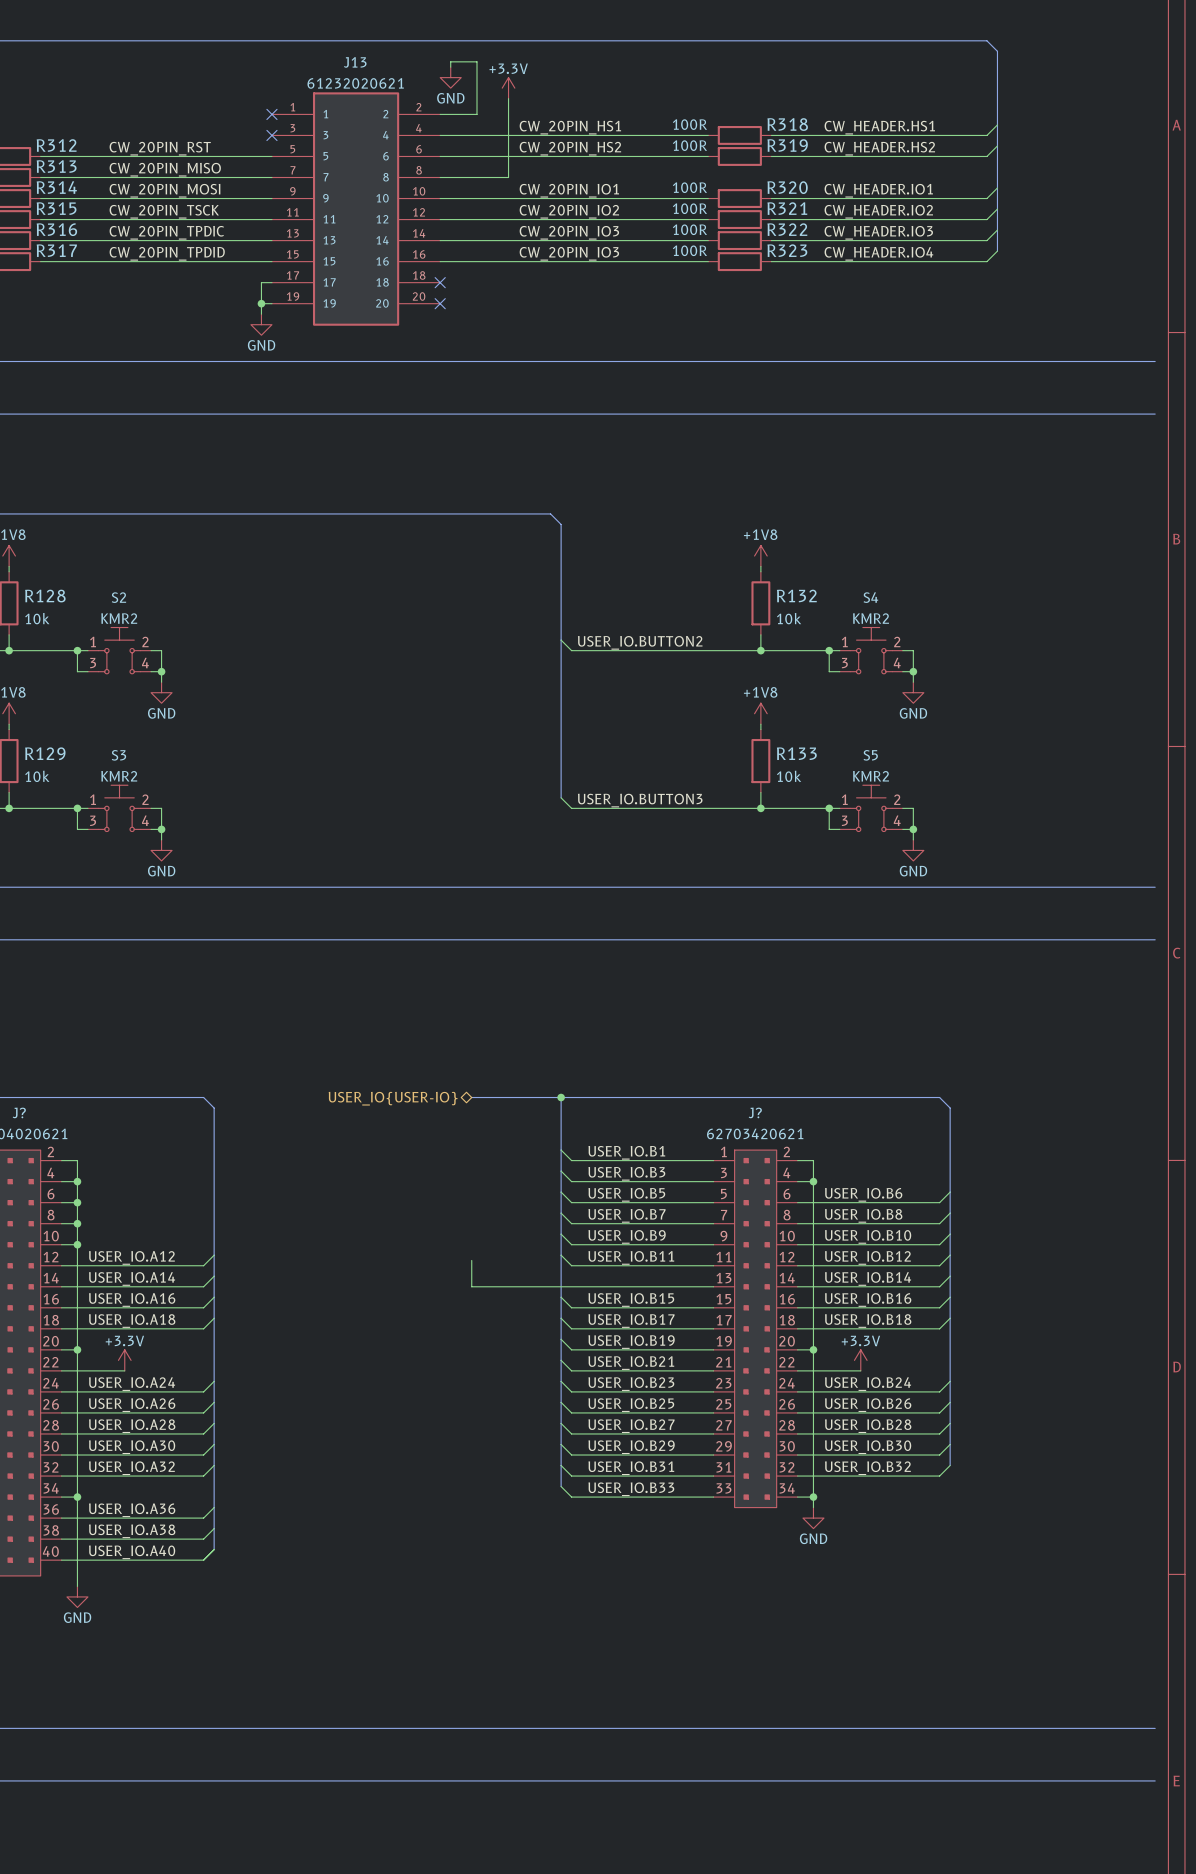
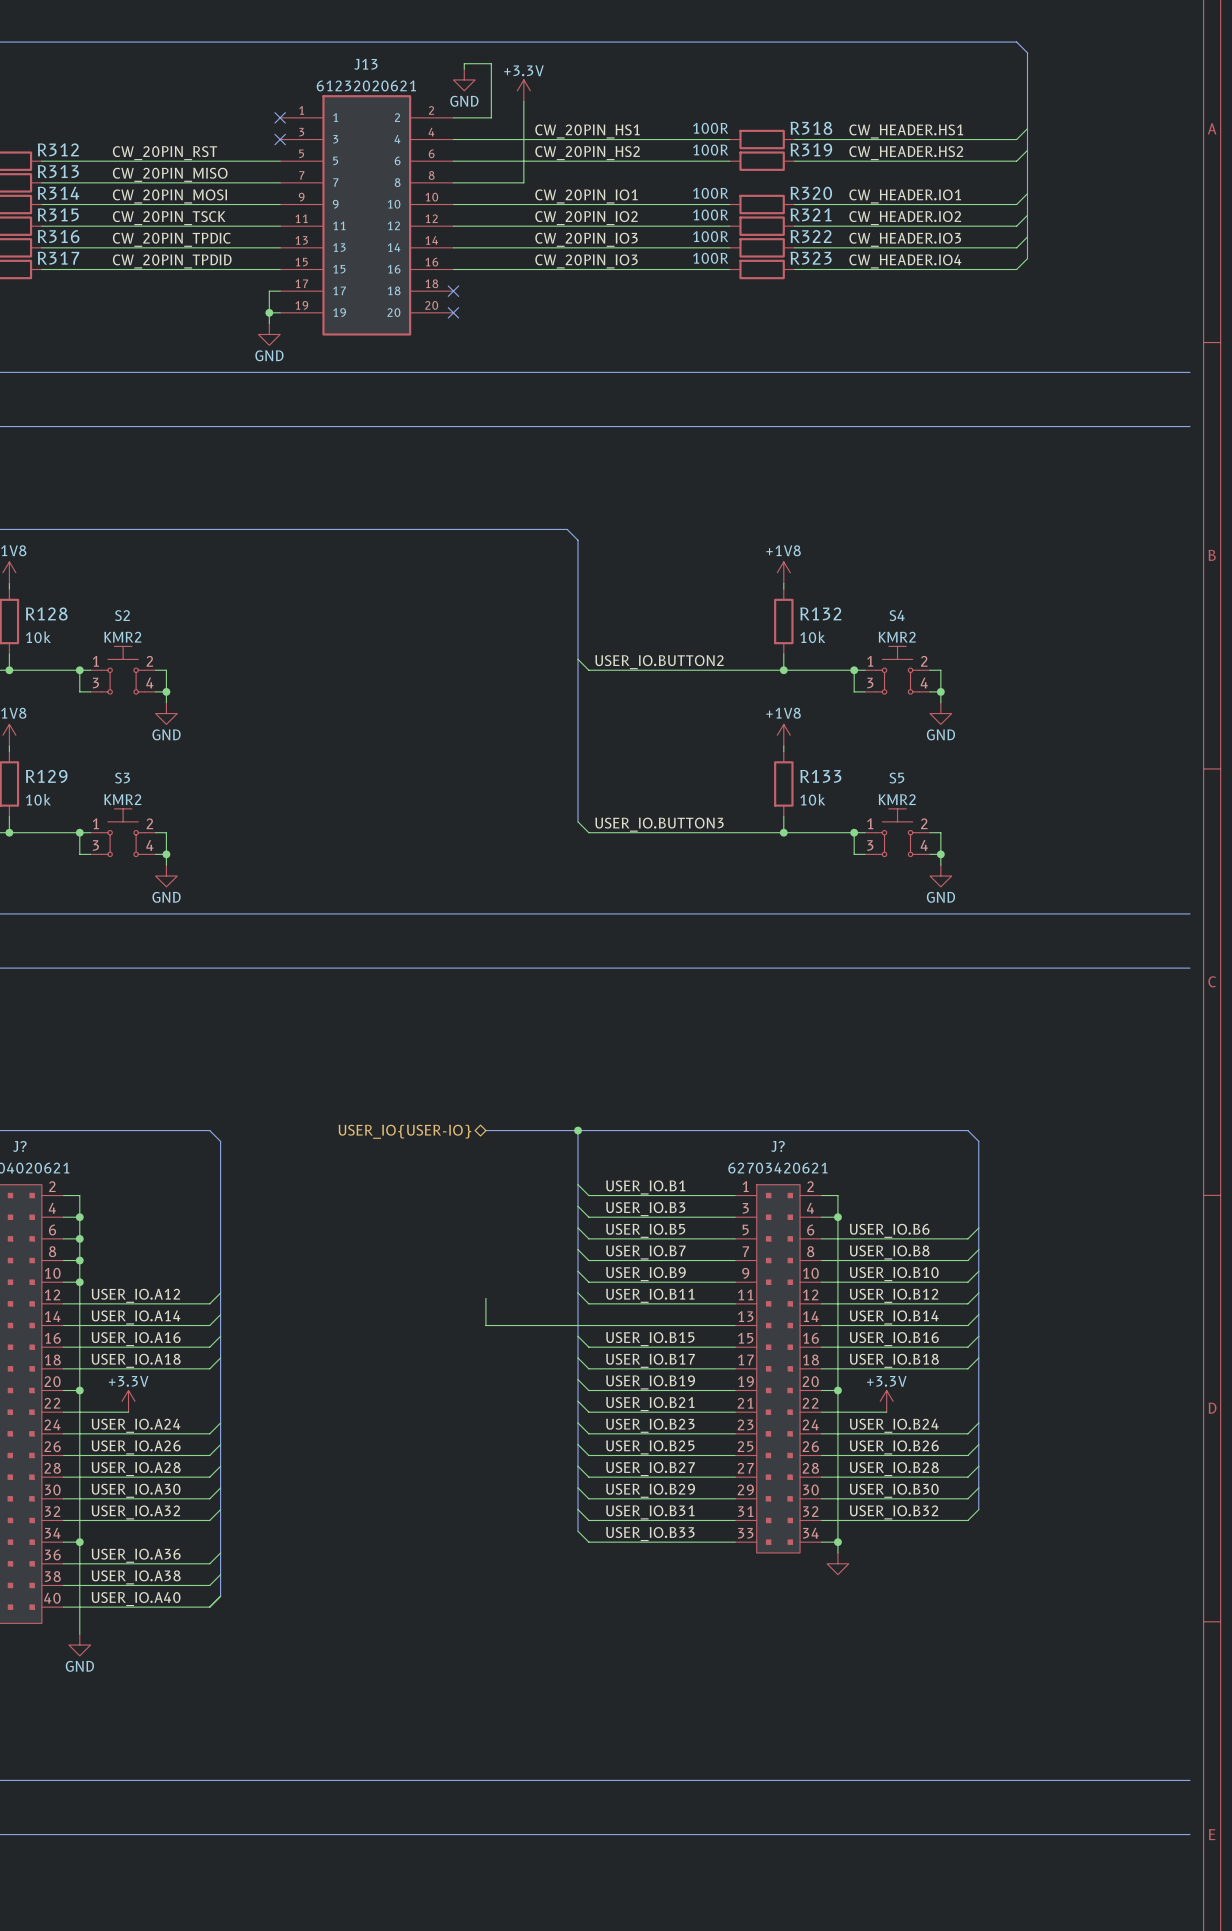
power symbol text: GND (813, 1538) -> none

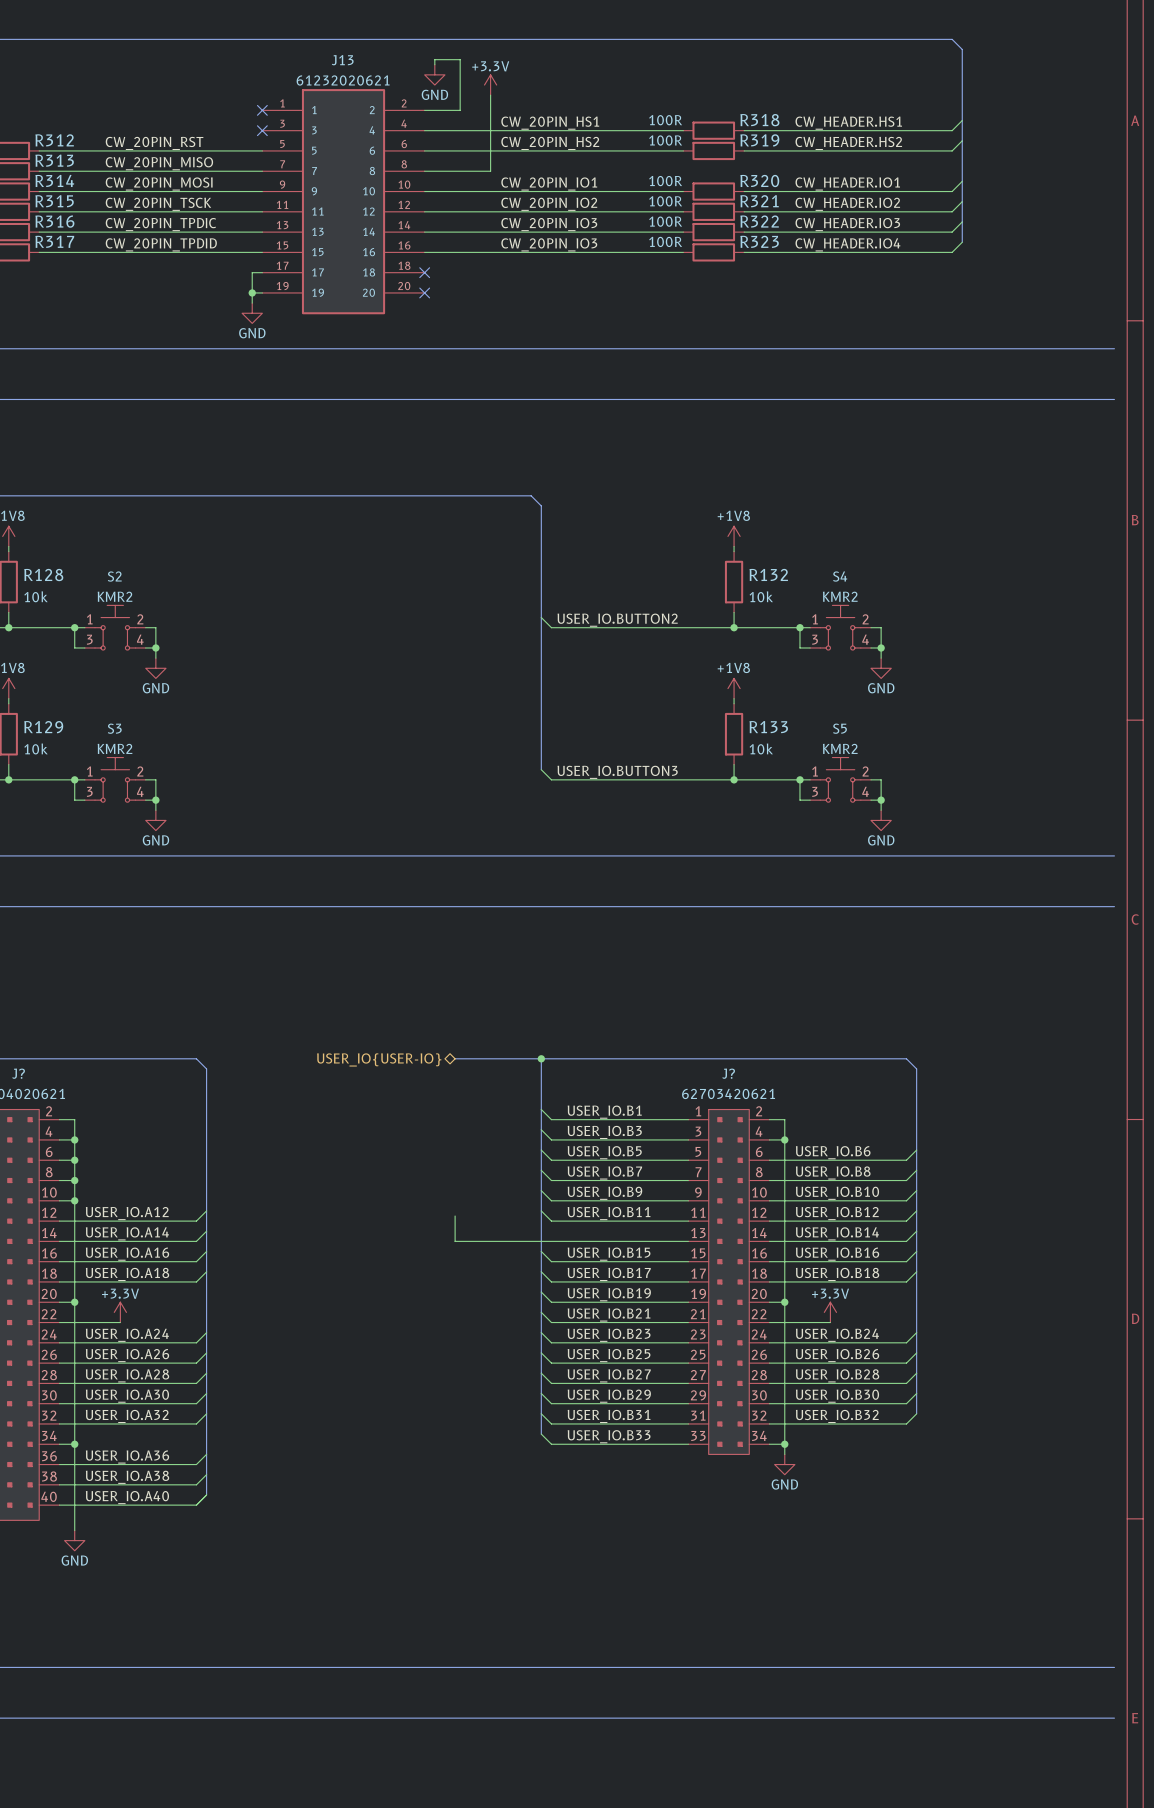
power symbol text: none -> GND (784, 1484)

